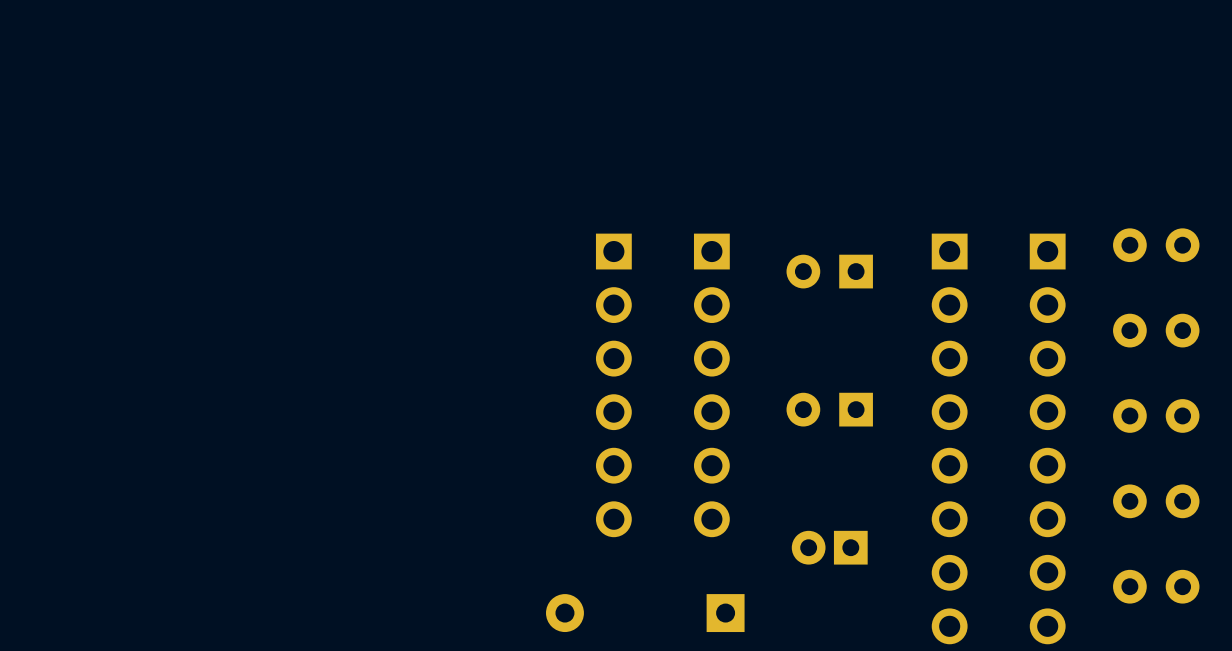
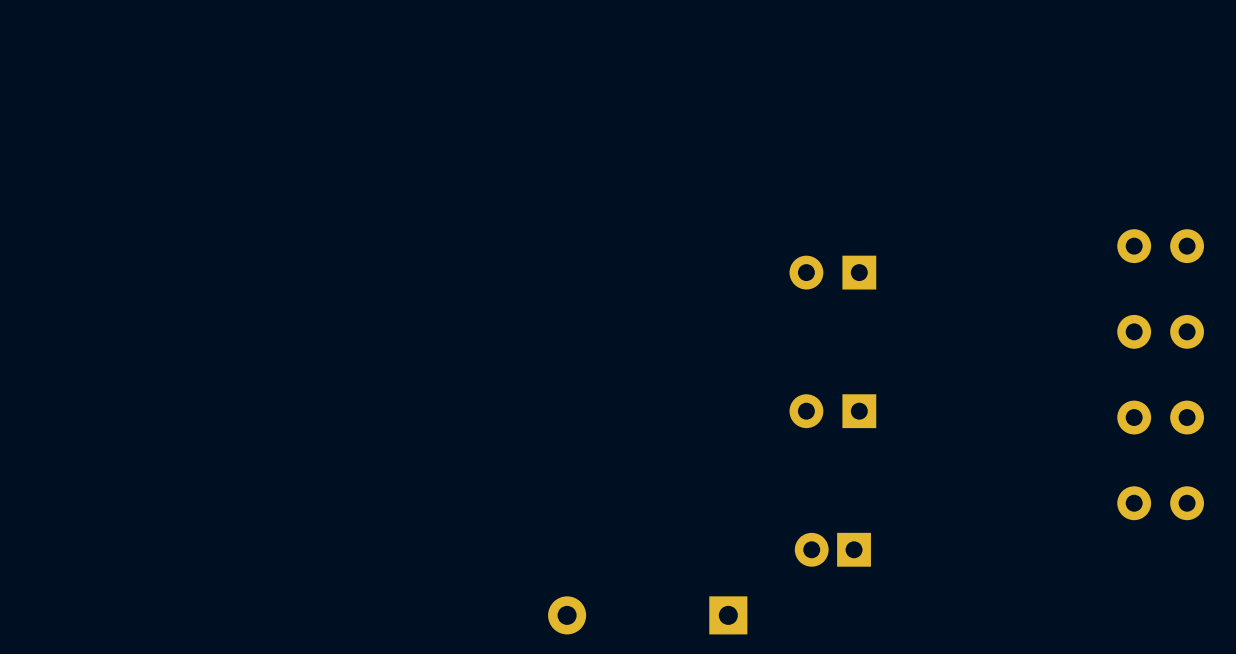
part: (613, 385) -> none
part: (711, 385) -> none
part: (949, 438) -> none
part: (1047, 438) -> none
part: (1156, 586) -> none

